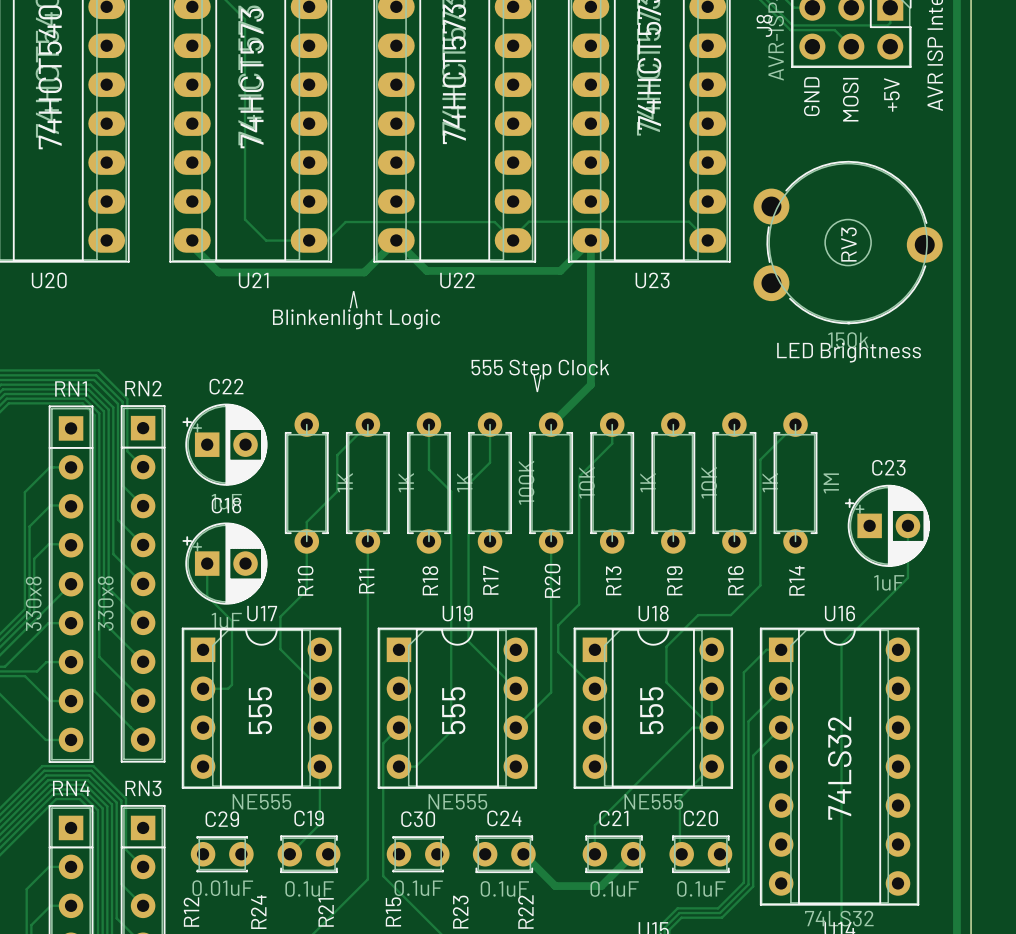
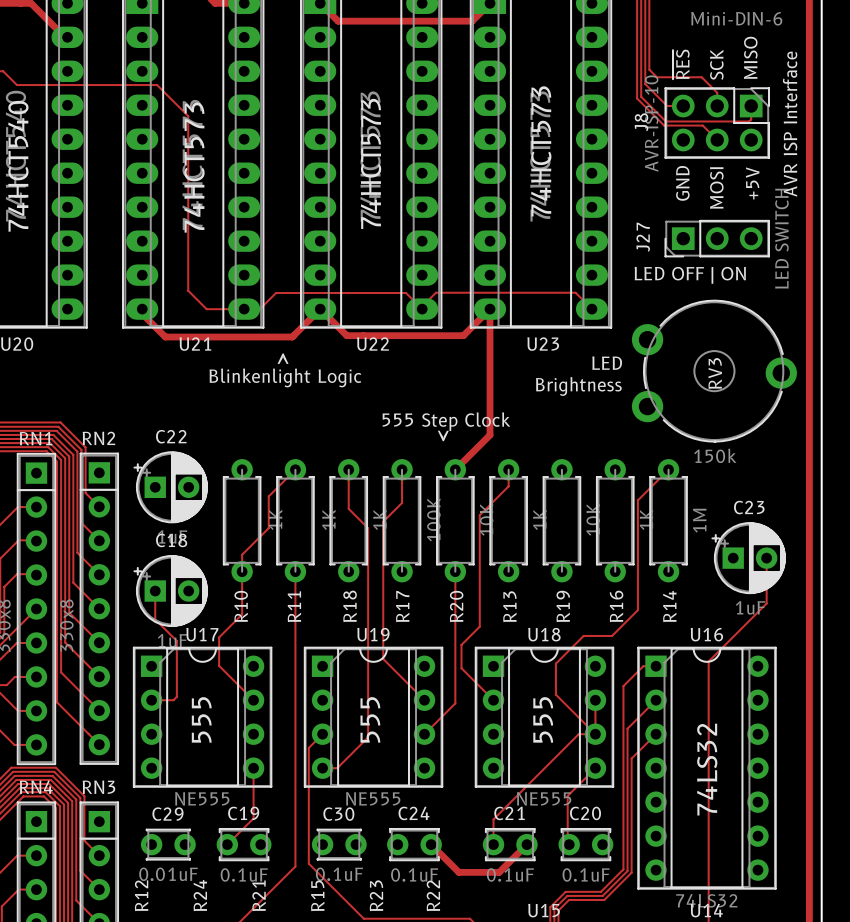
J27: none -> LED SWITCH (717, 238)
text: none -> LED OFF | ON (690, 275)
RV3 position: (848, 242) -> (714, 371)
text: none -> LED (607, 363)
text: none -> Brightness (578, 386)
text: LED Brightness (849, 352) -> none

